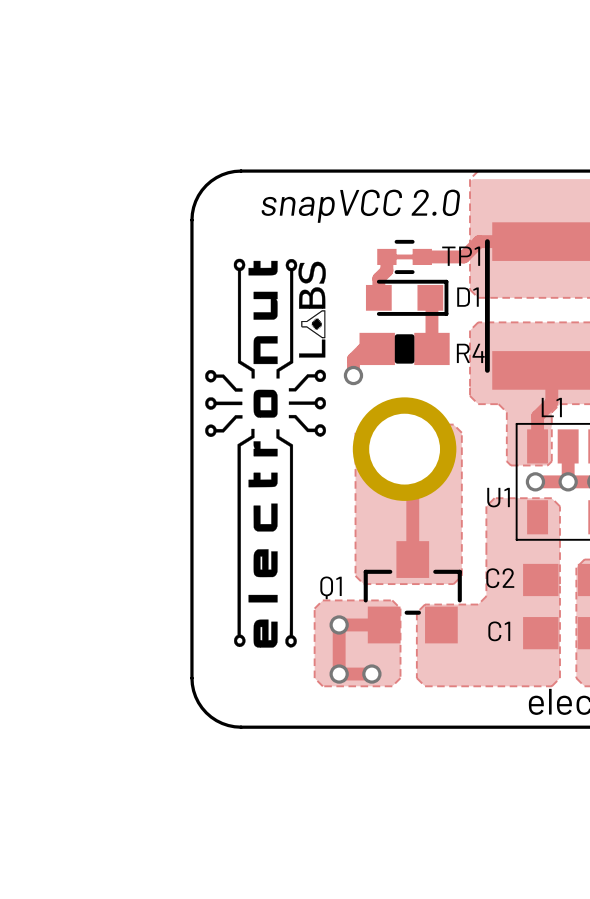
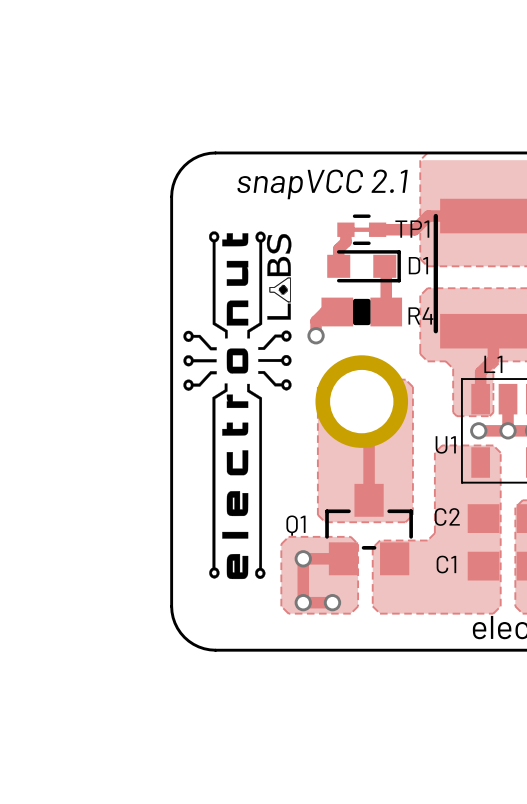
text: snapVCC 2.0 (360, 206) -> snapVCC 2.1 (322, 184)

